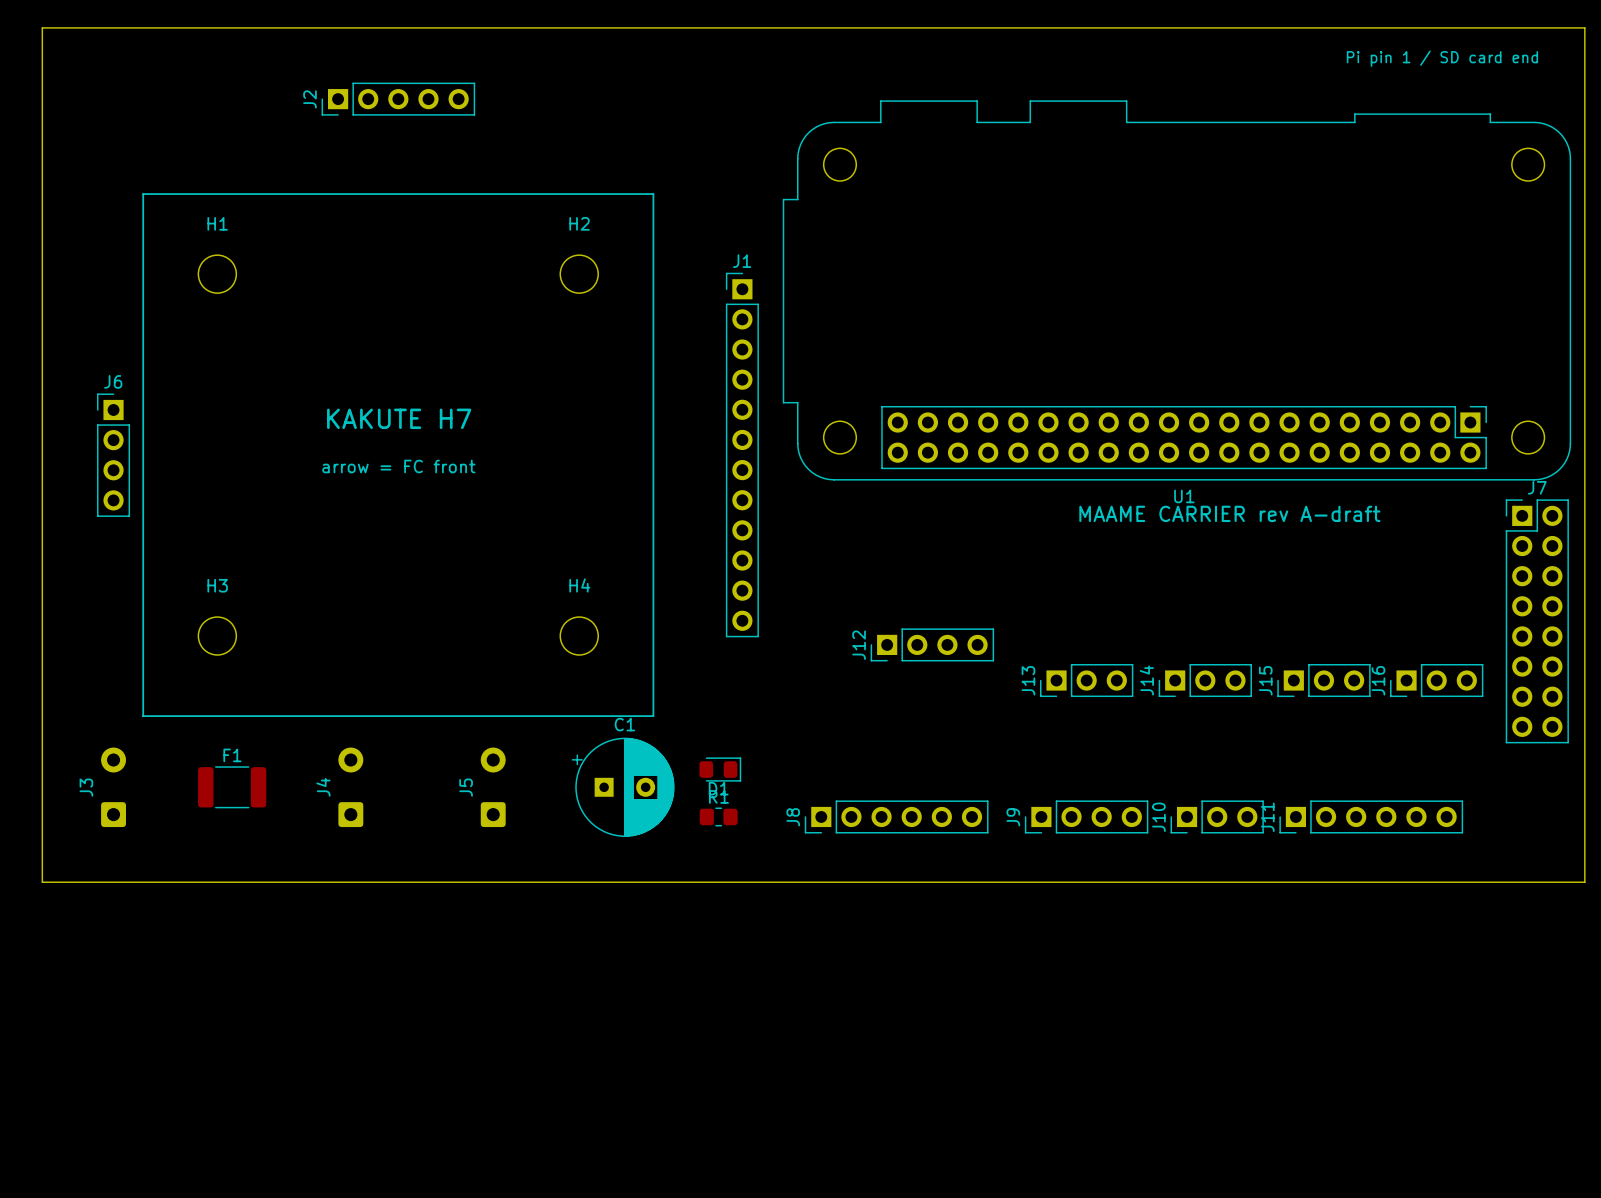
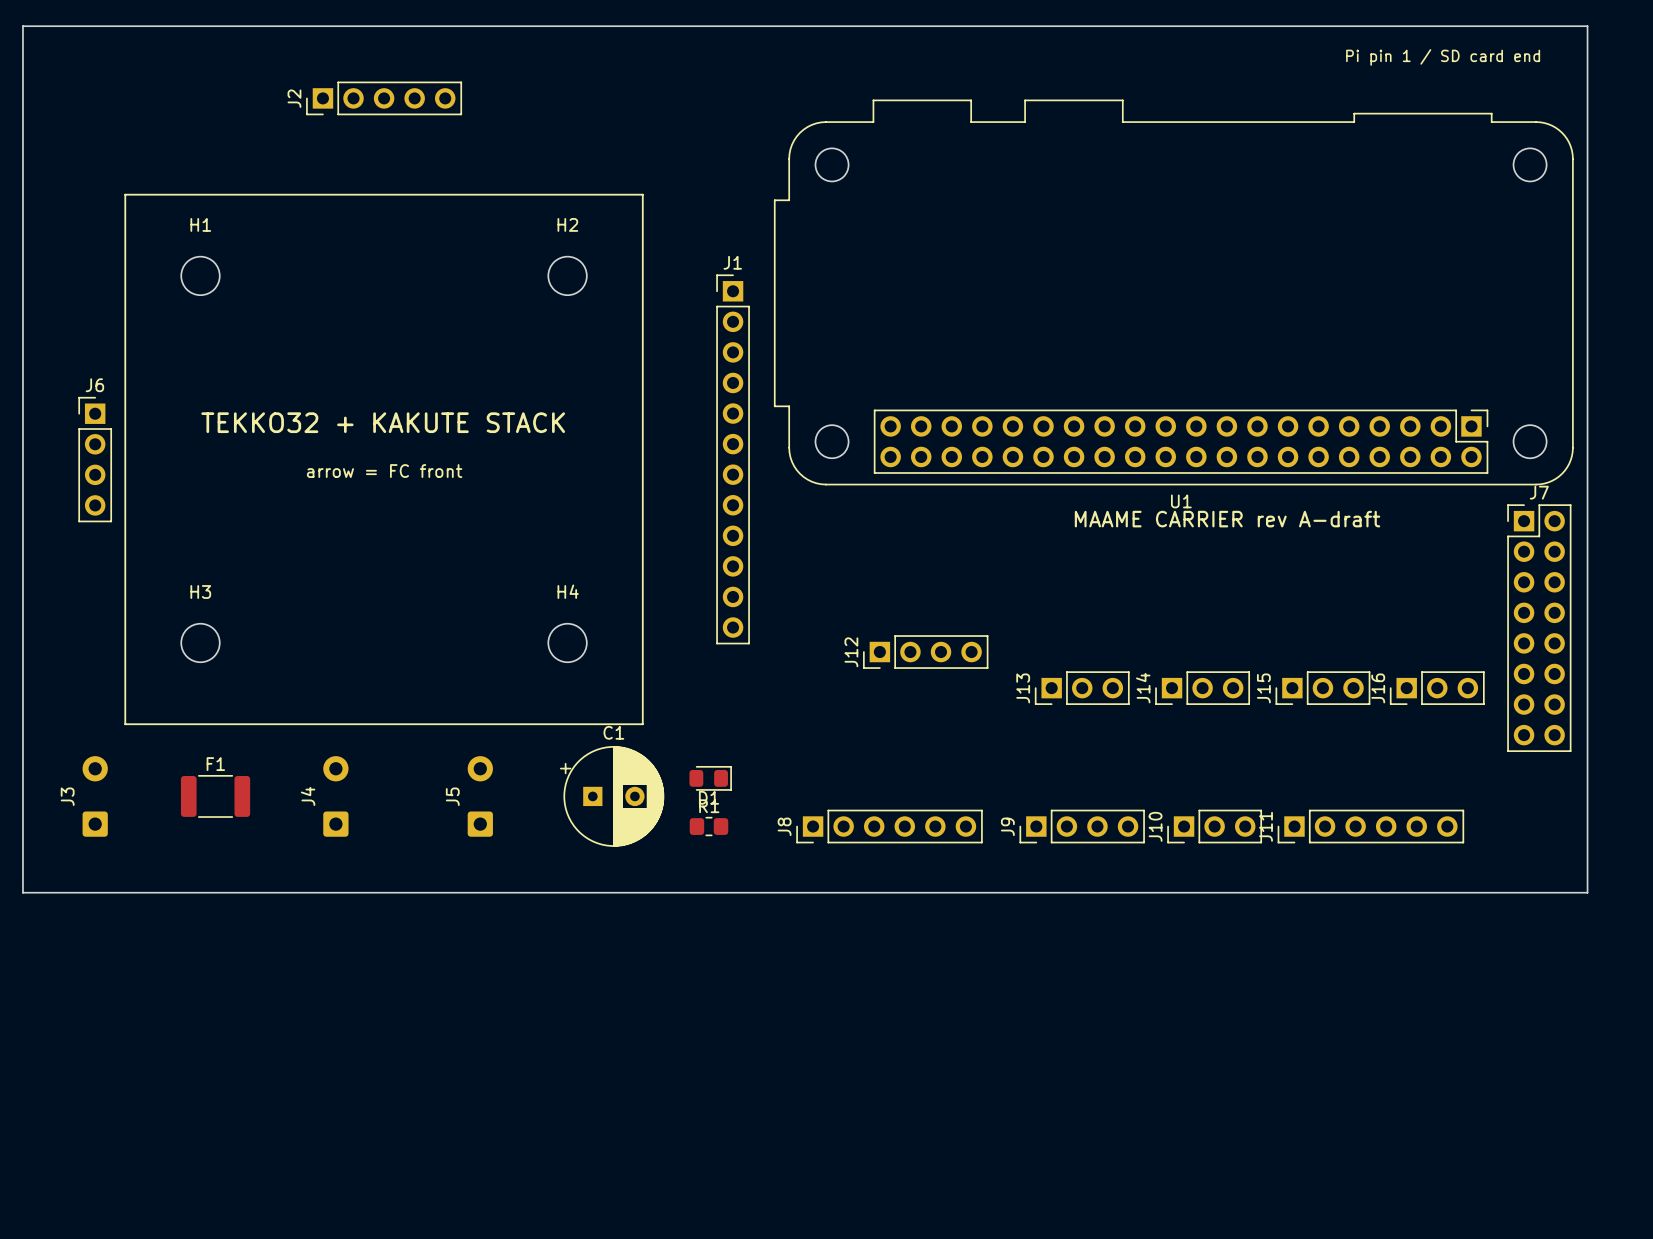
text: KAKUTE H7 (399, 418) -> TEKKO32 + KAKUTE STACK (383, 422)

